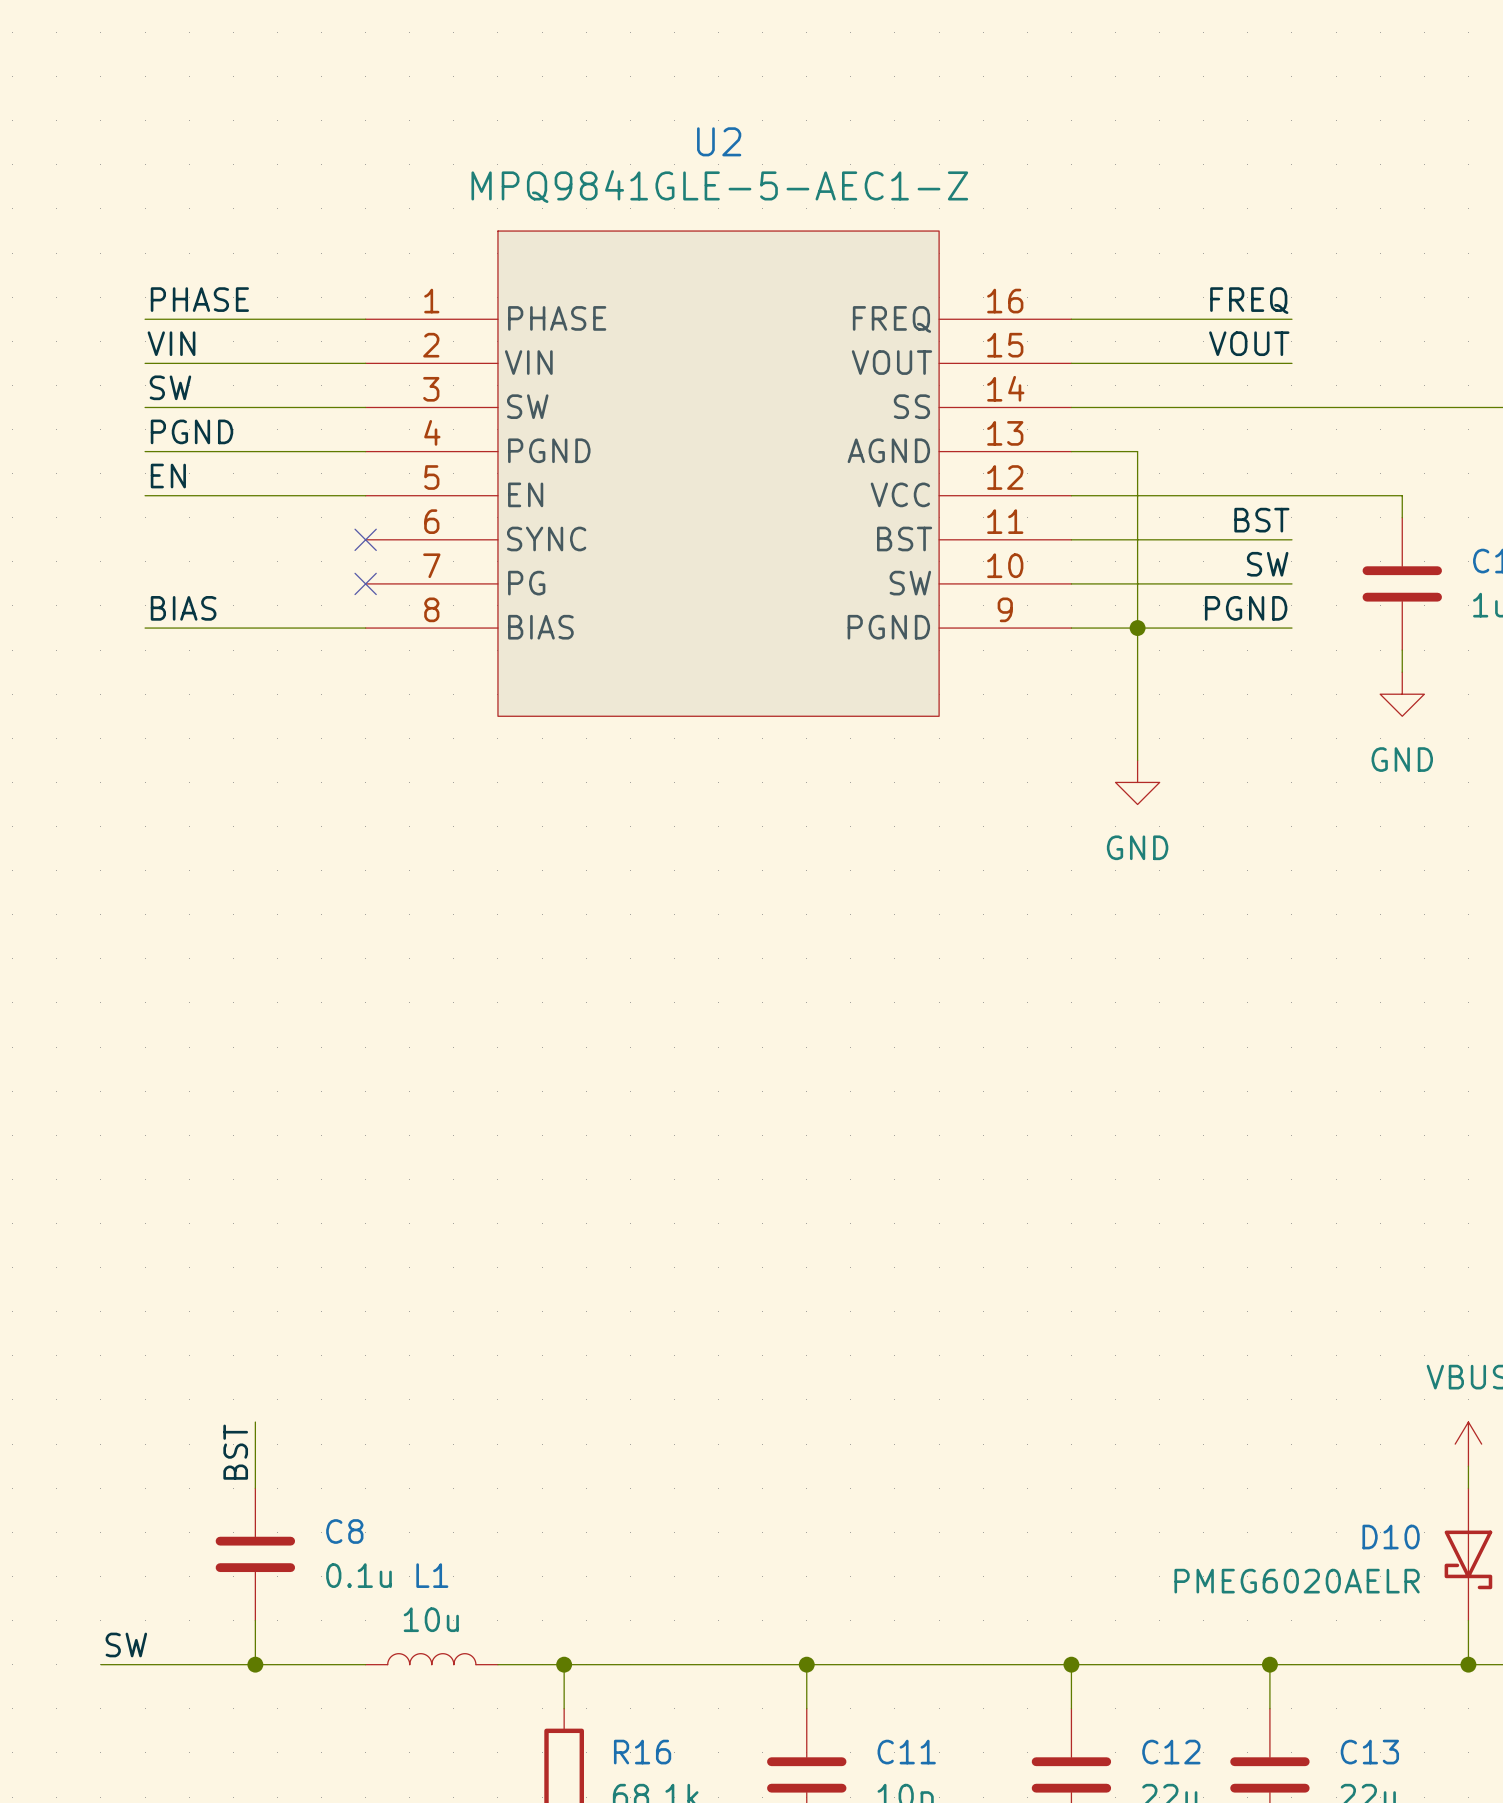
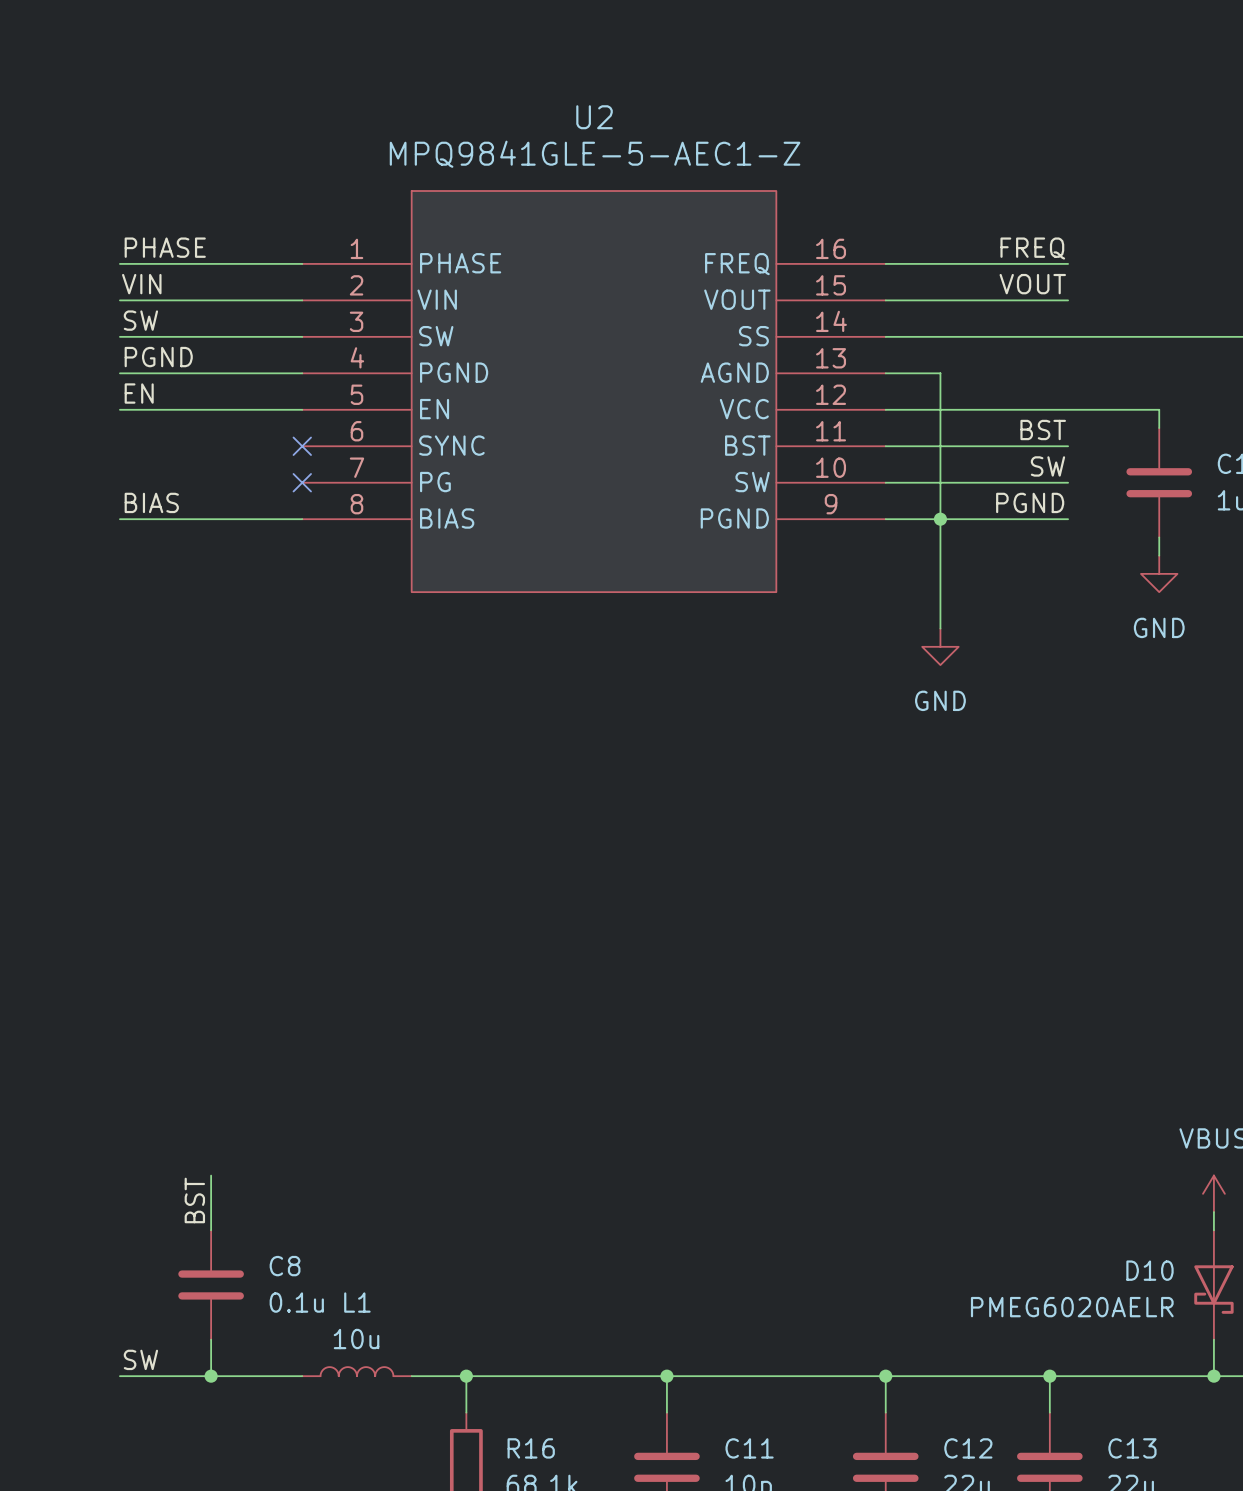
label position: SW (126, 1644) -> SW (140, 1359)
wire: (100, 1664) (145, 1664) -> none

